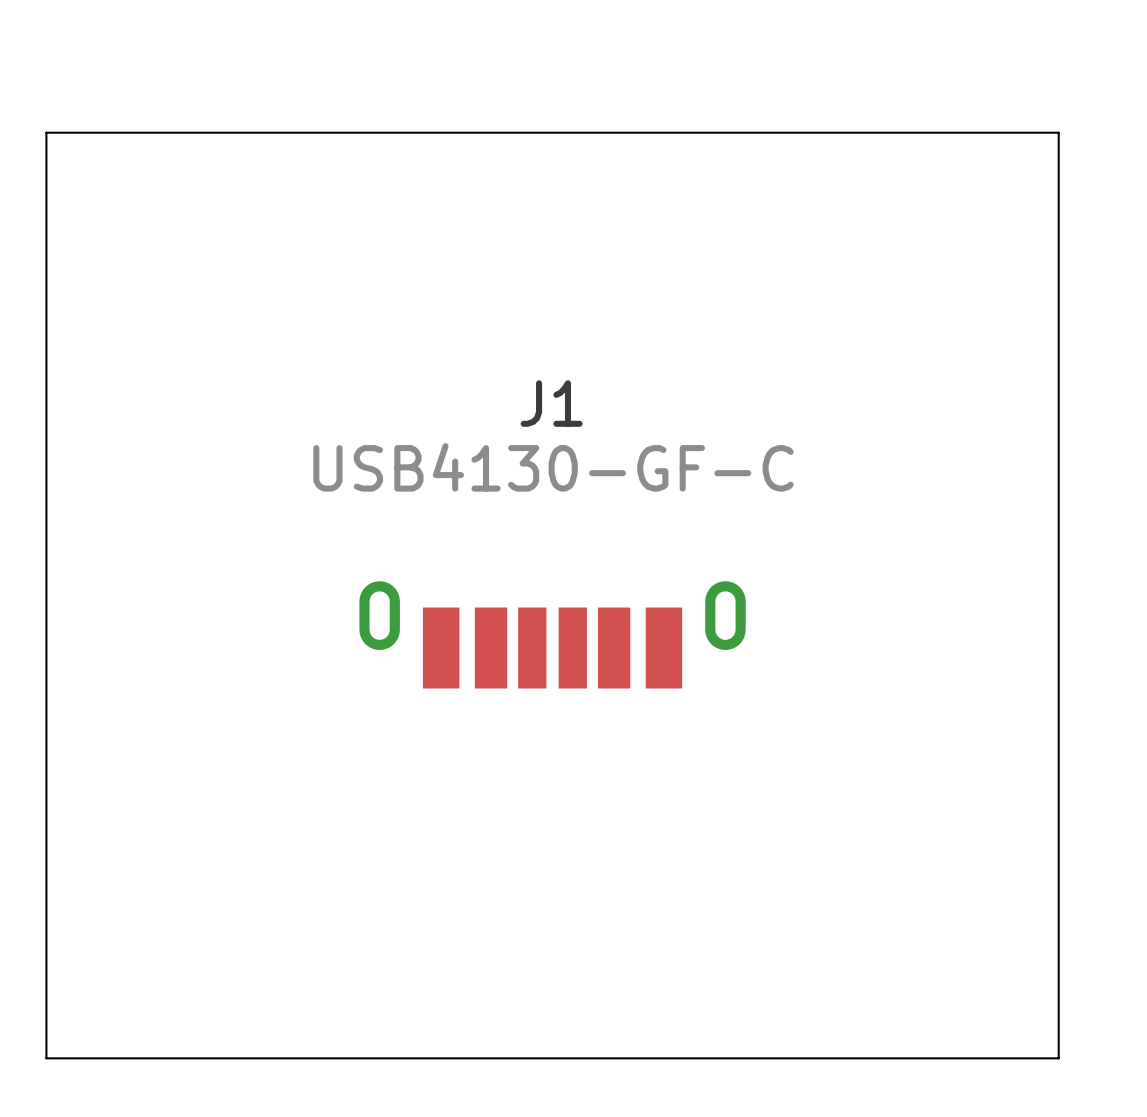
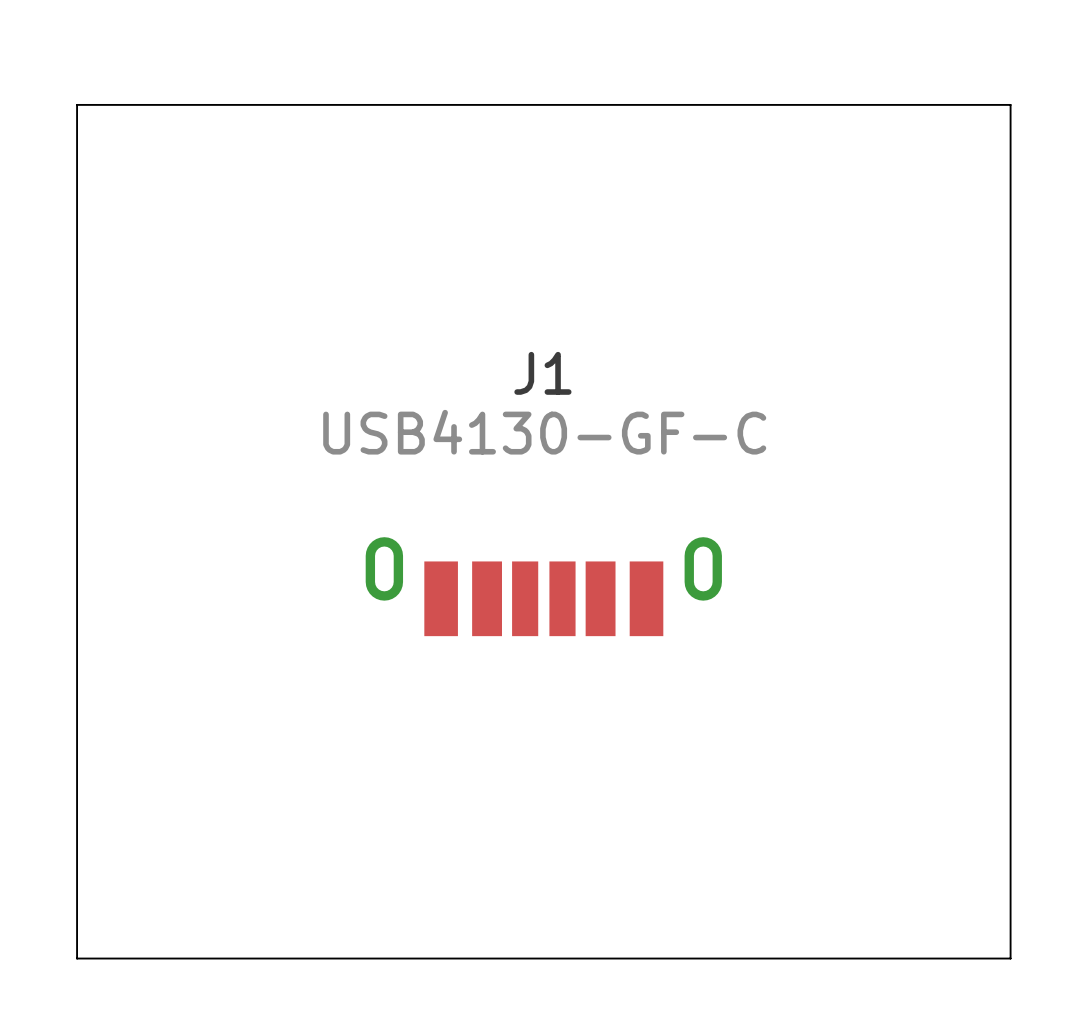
J1 position: (552, 634) -> (543, 586)

